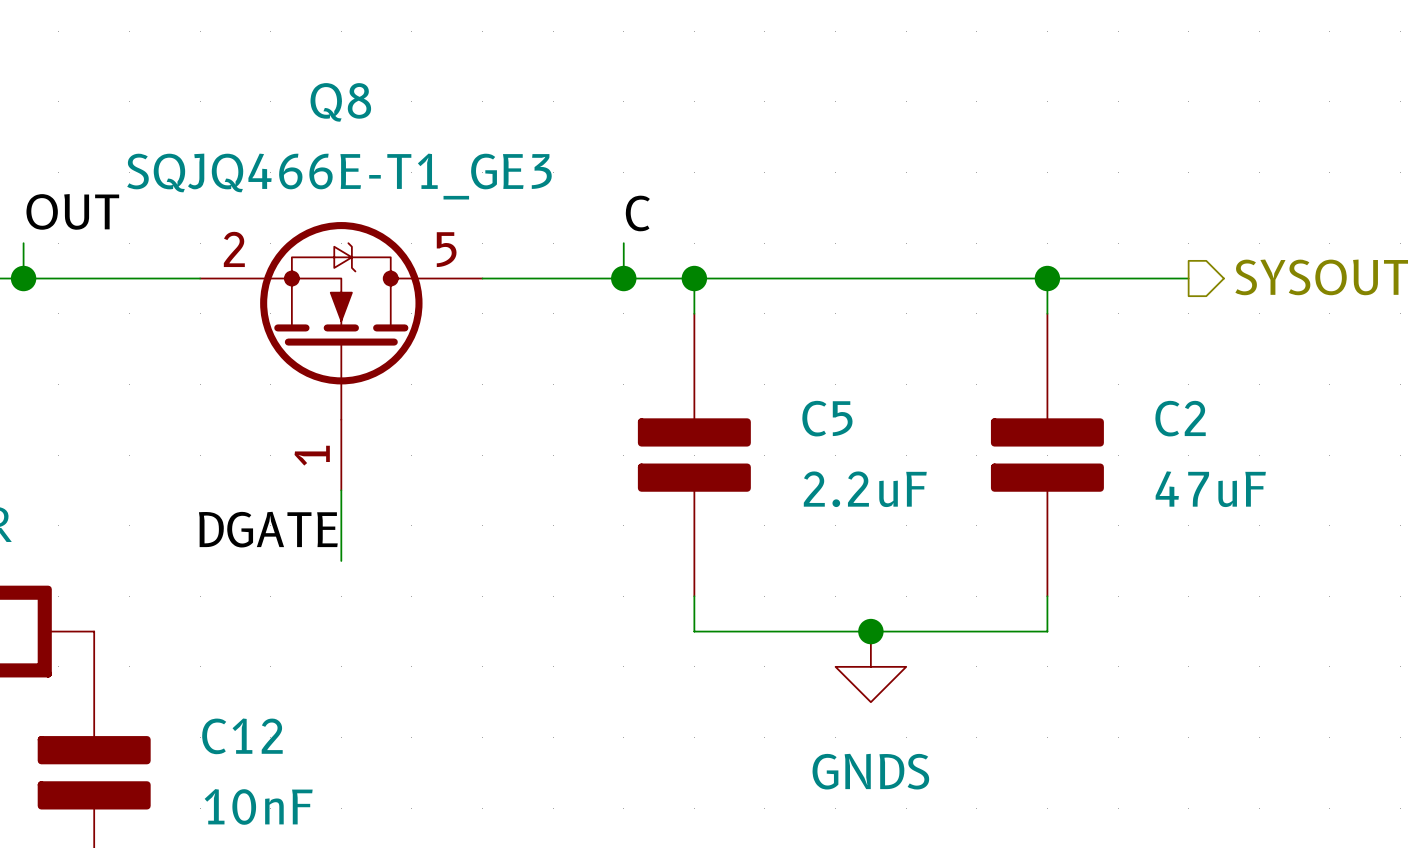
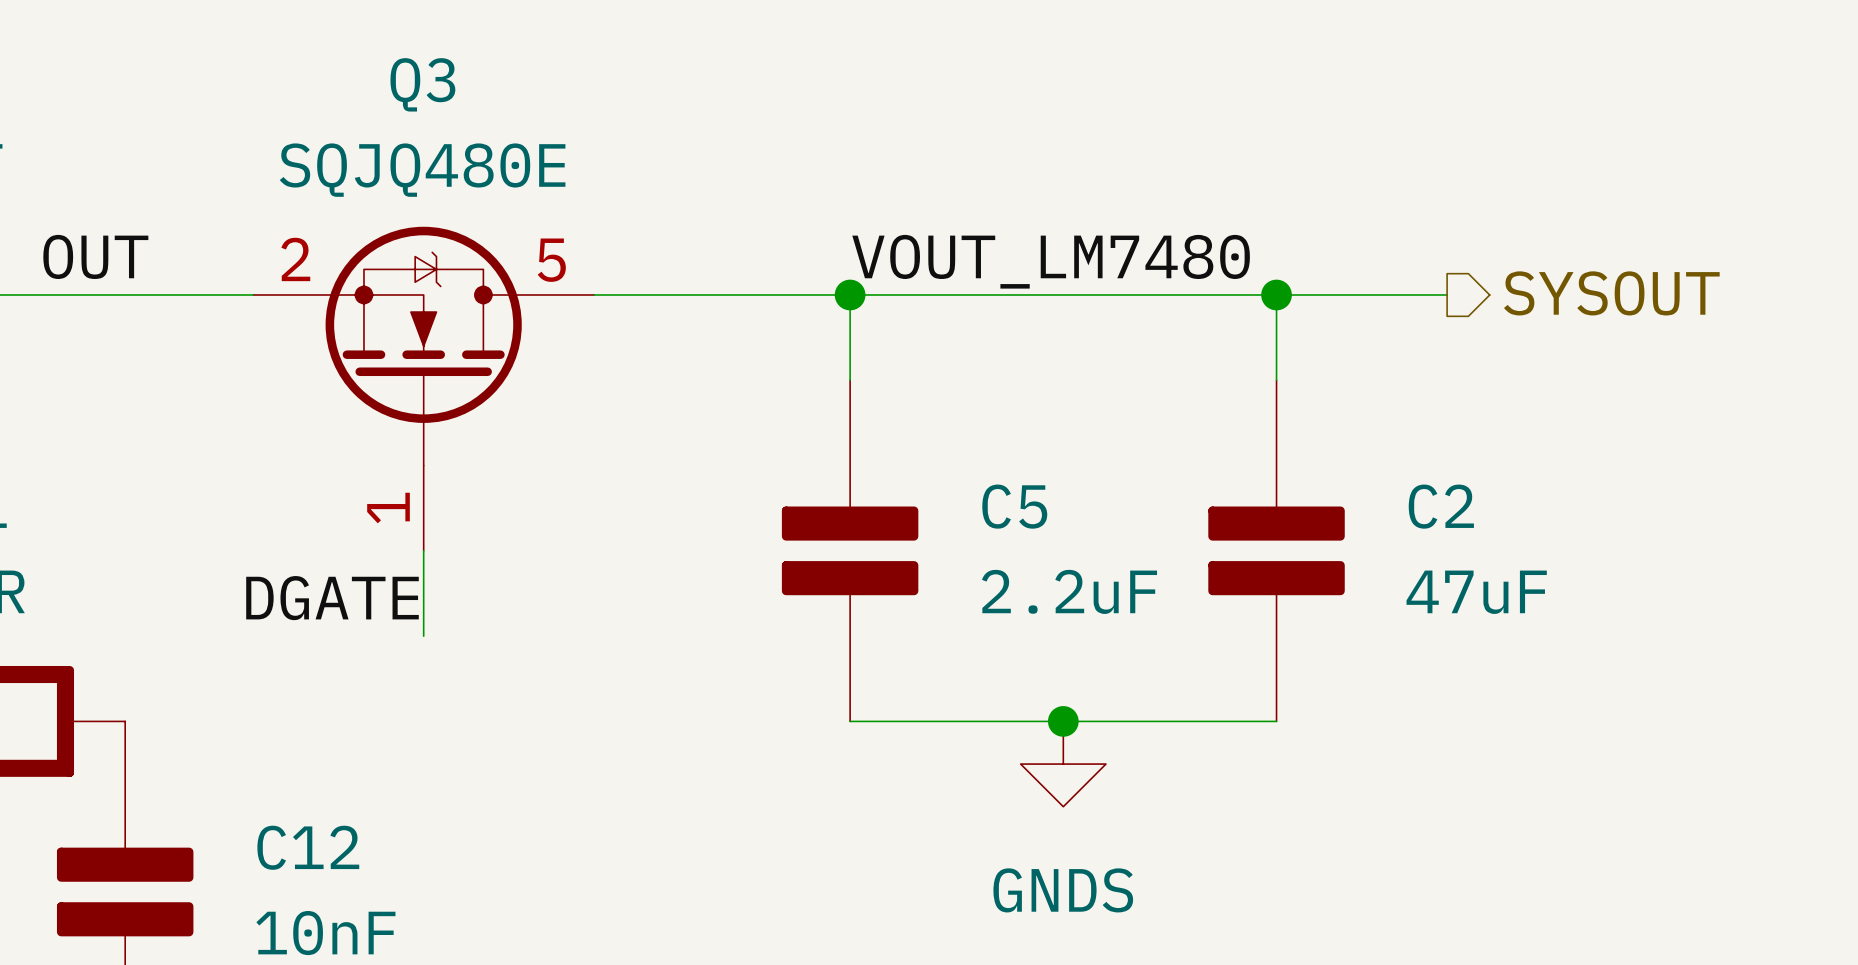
Q8 name: Q8 (340, 102) -> Q3 (422, 84)
Q8 value: SQJQ466E-T1_GE3 (339, 176) -> SQJQ480E (422, 170)
label position: OUT (72, 211) -> OUT (95, 256)
label: C (637, 213) -> none
wire: (23, 243) (23, 278) -> none
wire: (623, 243) (623, 278) -> none
label: none -> VOUT_LM7480 (1051, 261)
junction: (23, 278) -> none
junction: (623, 278) -> none
C5 position: (694, 455) -> (850, 550)
C2 position: (1047, 455) -> (1276, 550)

